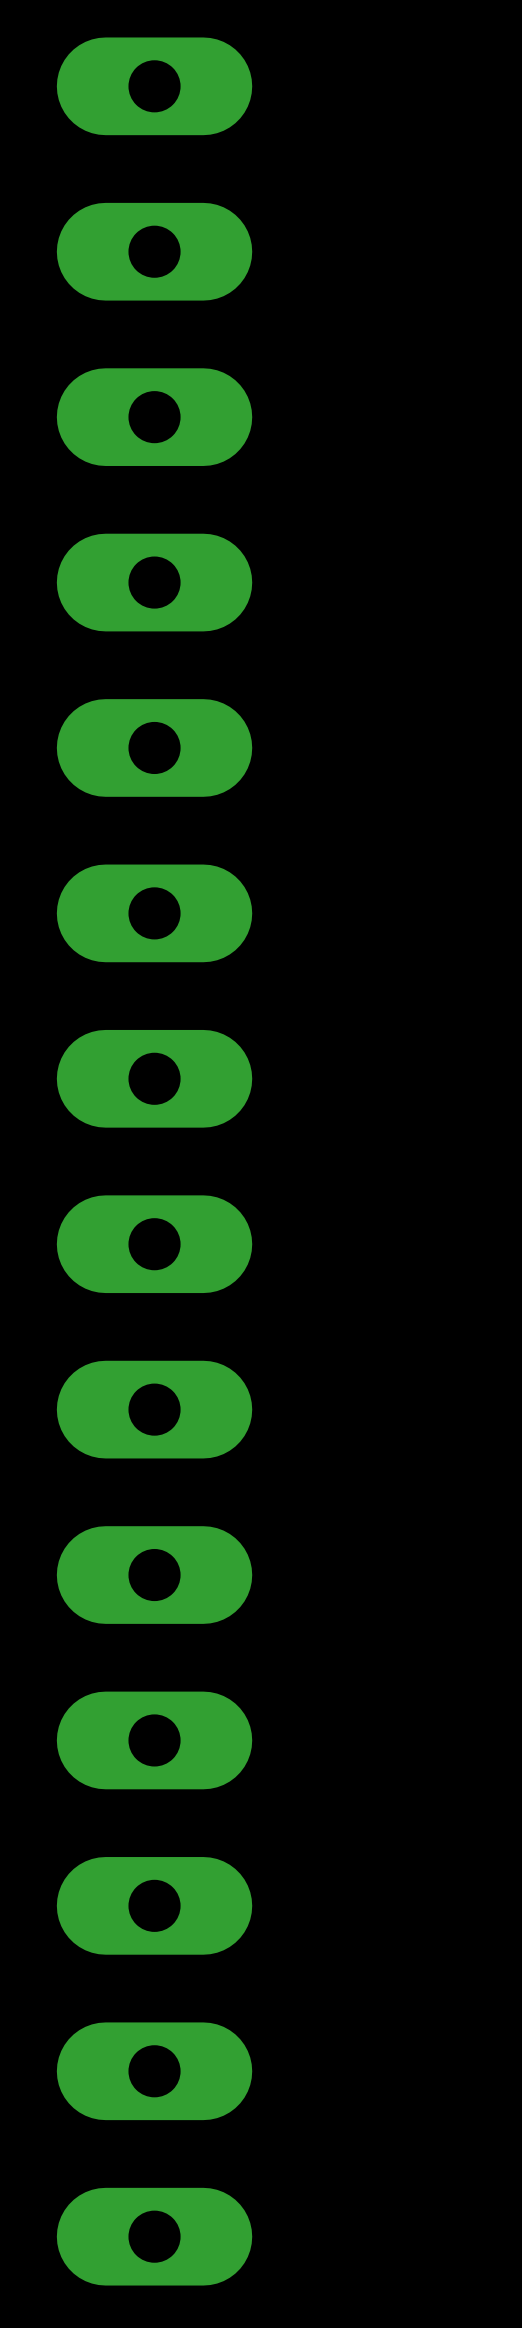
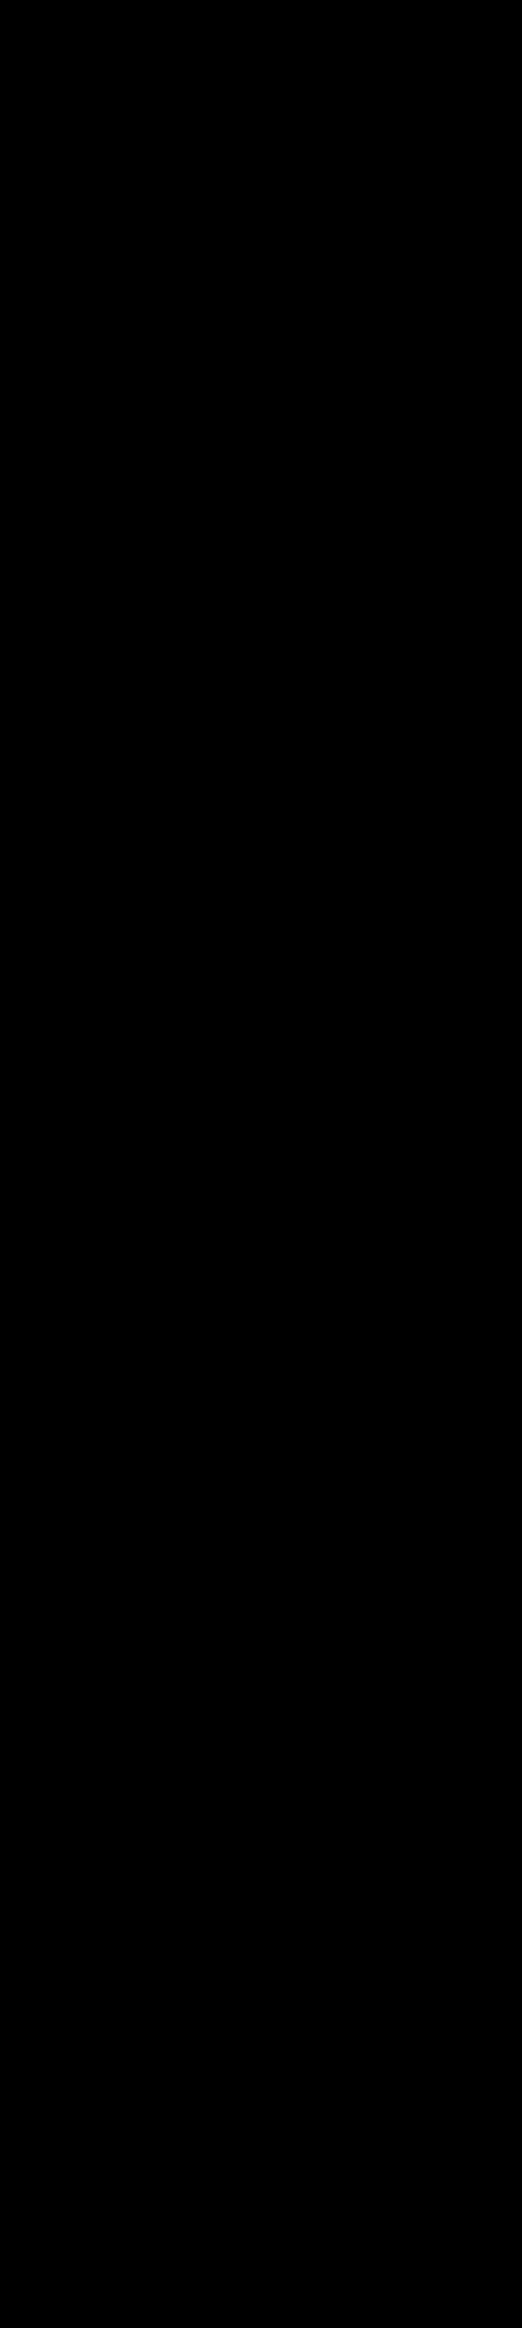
part: (154, 1161) -> none

